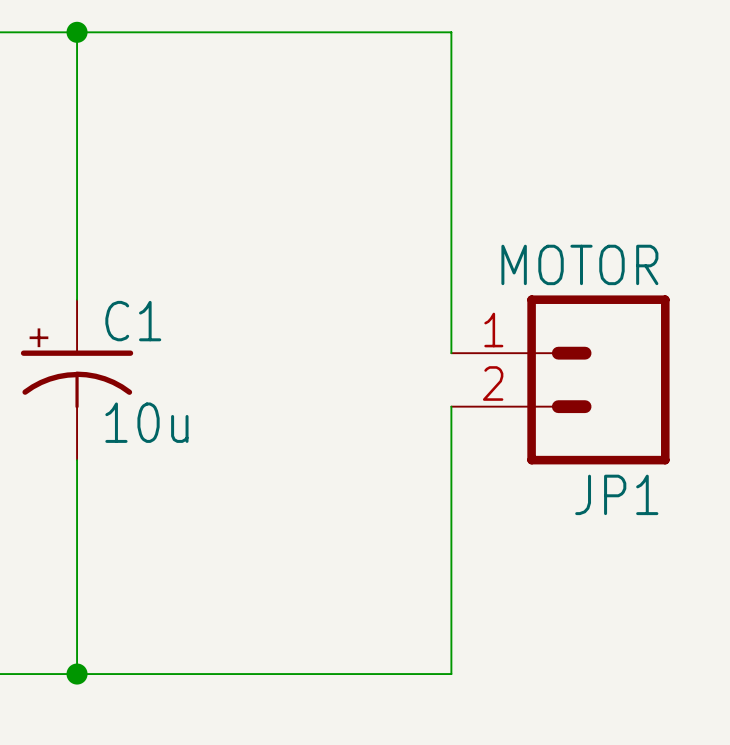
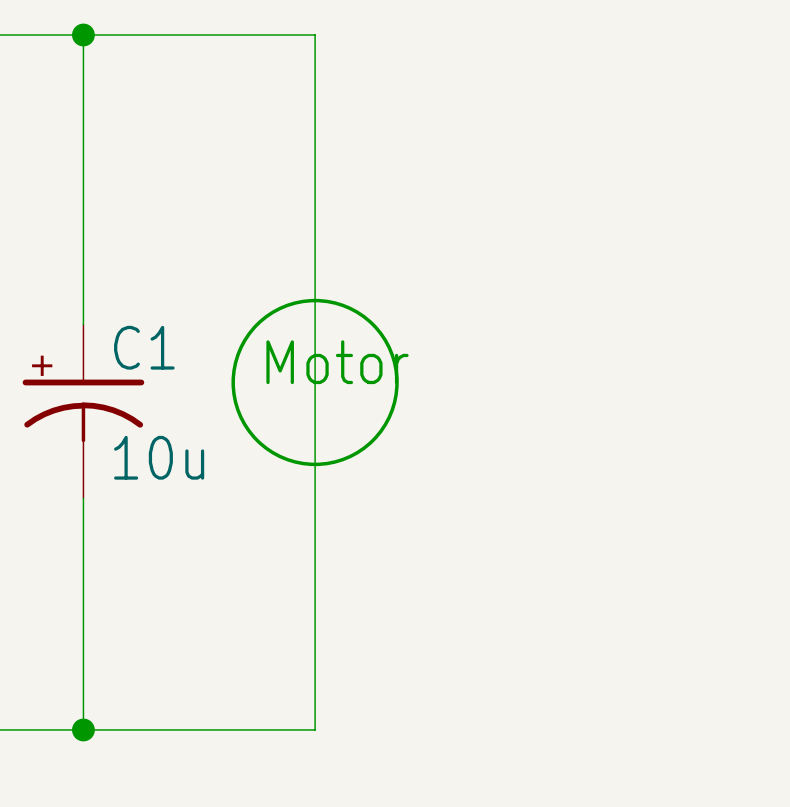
wire: (290, 32) (451, 32) (451, 353) -> (315, 35) (315, 729)
drawing: none -> [231, 298, 399, 467]
text: none -> Motor (337, 362)
JP1: MOTOR (560, 379) -> none
wire: (451, 406) (451, 674) (290, 674) -> none

